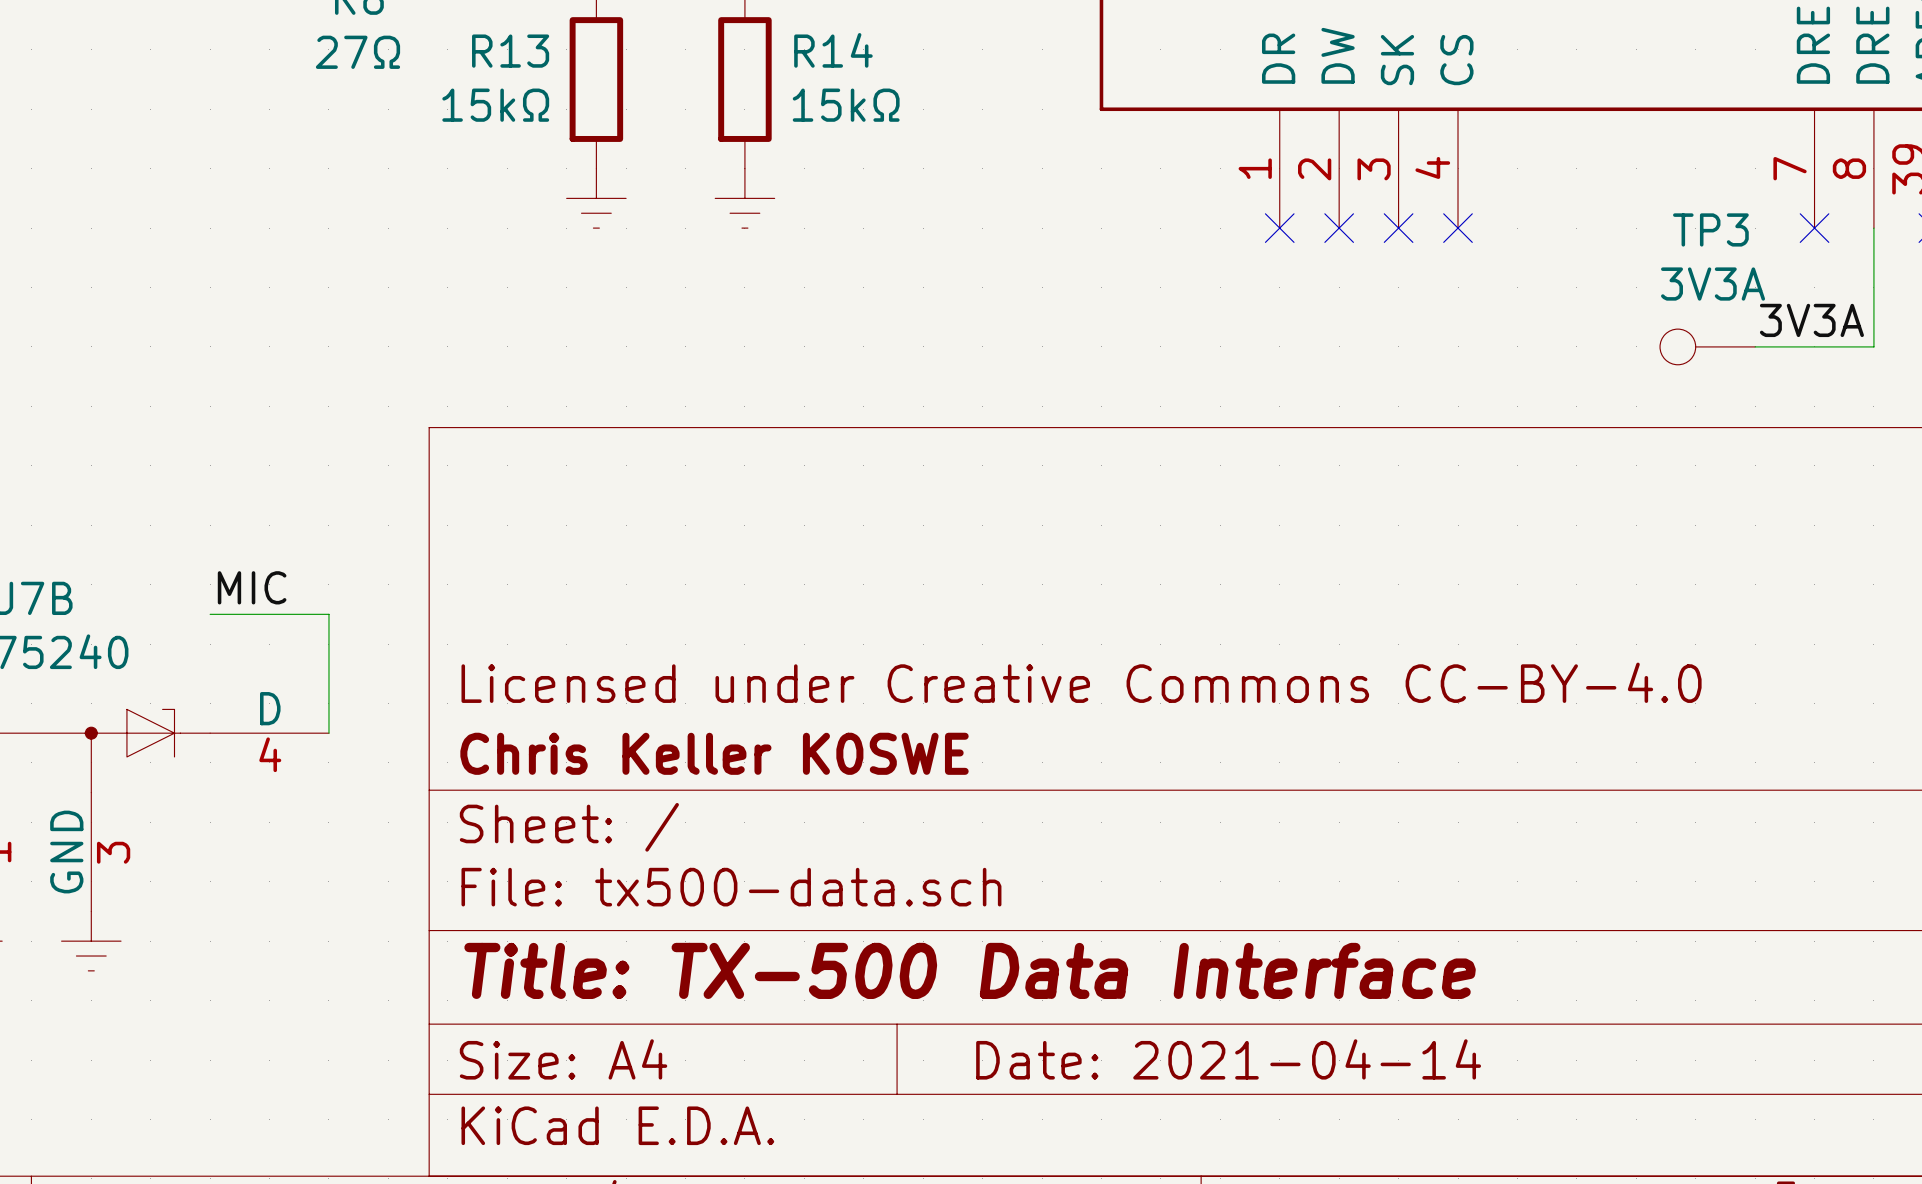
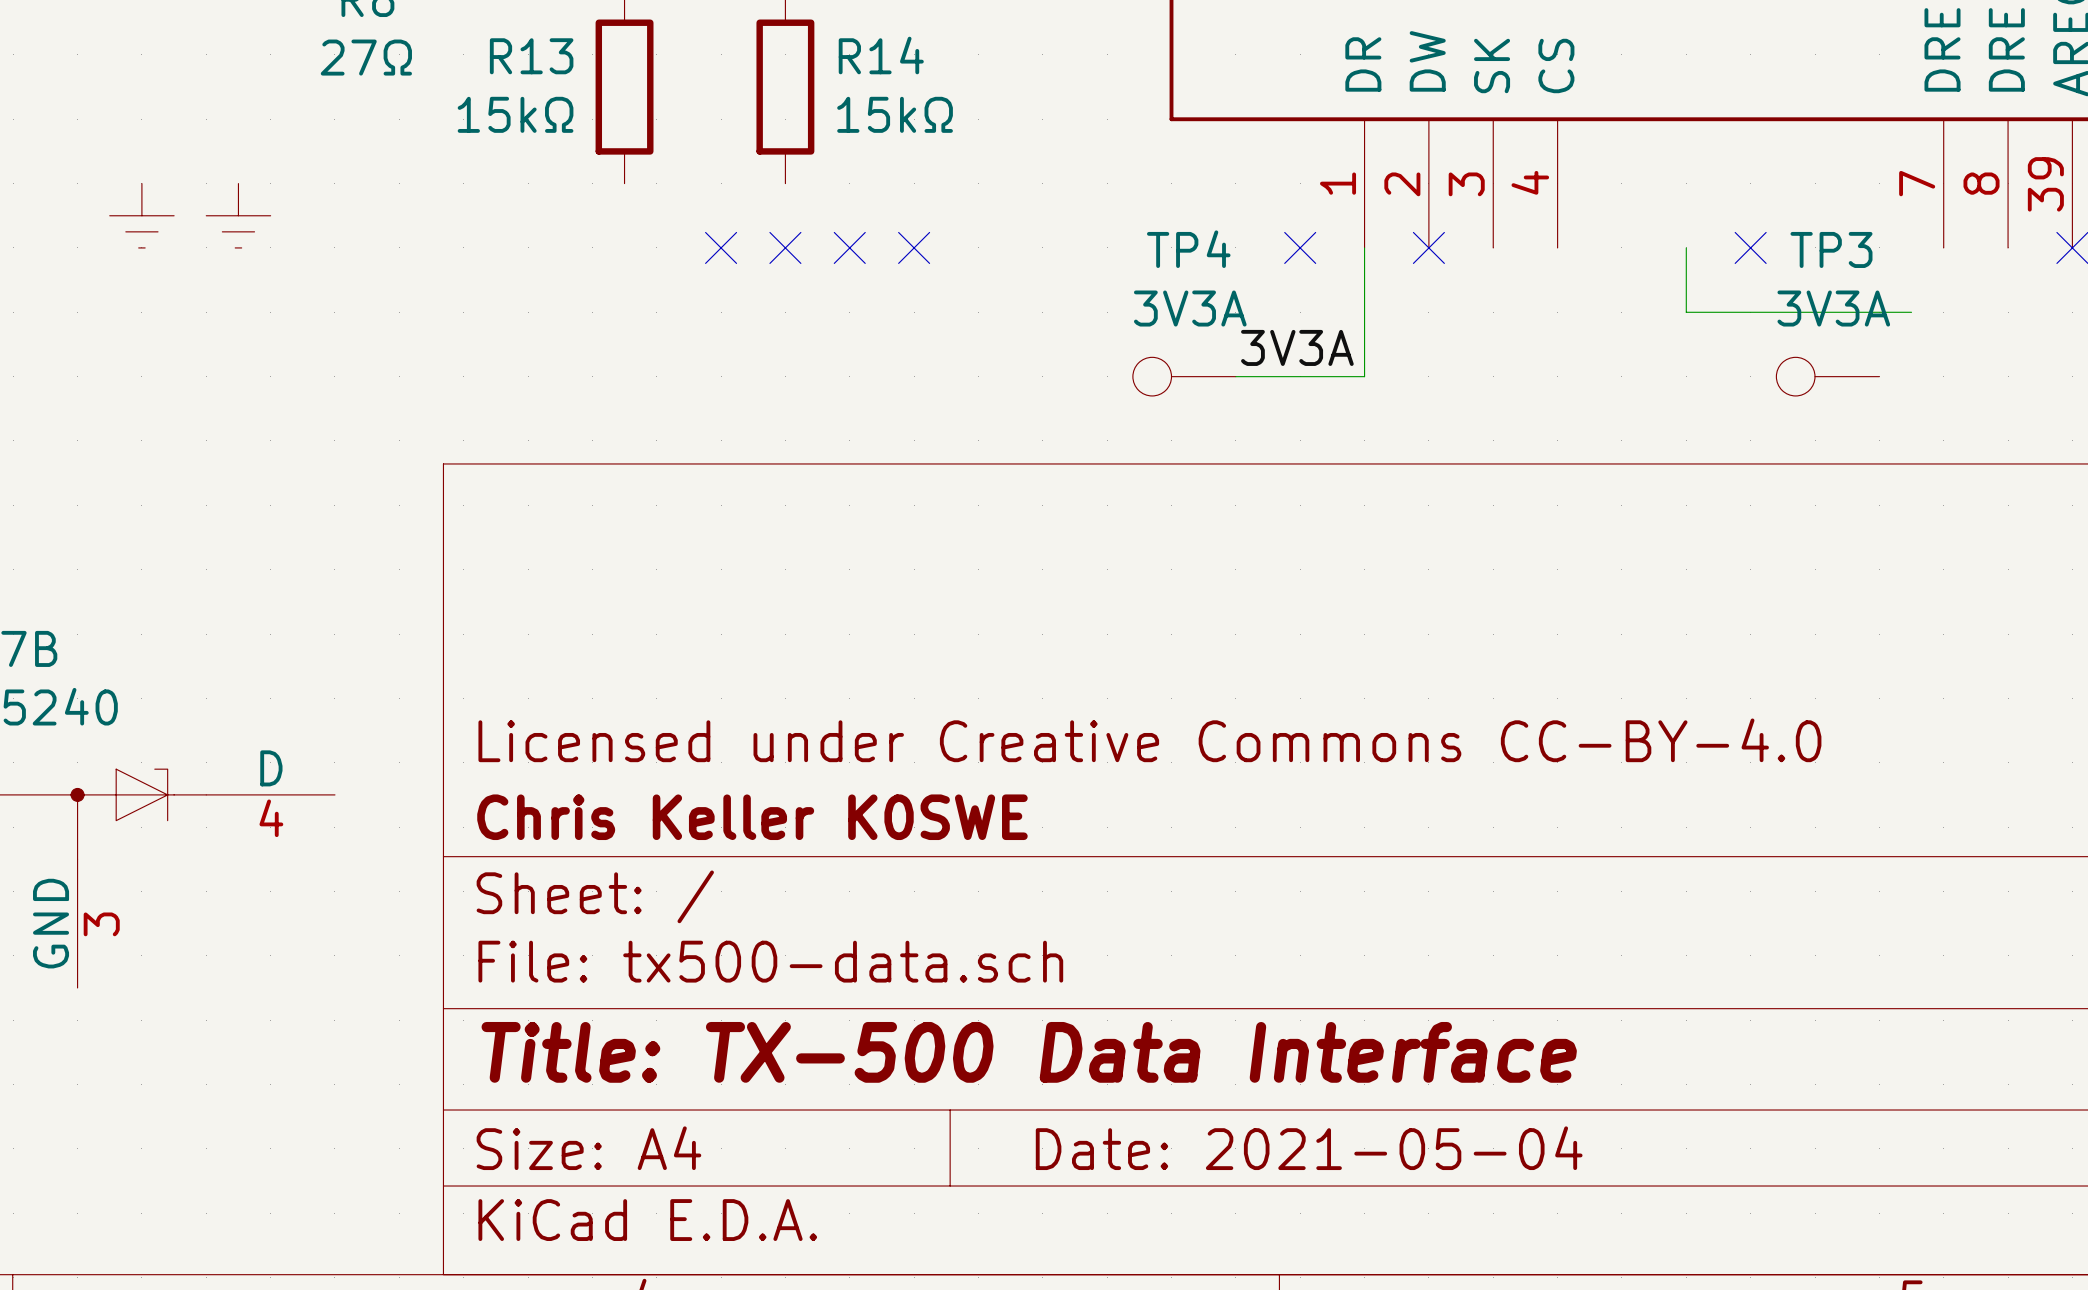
power symbol: none -> (141, 215)
power symbol: none -> (238, 215)
power symbol: (596, 198) -> none
power symbol: (744, 198) -> none
no-connect mark: none -> (721, 247)
no-connect mark: none -> (785, 247)
no-connect mark: none -> (849, 247)
no-connect mark: none -> (914, 247)
wire: none -> (1364, 247) (1364, 376) (1235, 376)
no-connect mark position: (1279, 228) -> (1300, 247)
no-connect mark: (1398, 228) -> none
no-connect mark: (1458, 228) -> none
wire: none -> (1686, 247) (1686, 312) (1911, 312)
no-connect mark: none -> (1750, 247)
no-connect mark: (1814, 228) -> none
wire: (1873, 228) (1873, 346) (1755, 346) -> none
label: none -> 3V3A (1297, 347)
label: 3V3A (1811, 320) -> none
TP4: none -> 3V3A (1184, 376)
label: MIC (252, 587) -> none
wire: (210, 614) (328, 614) (328, 733) -> none
power symbol: (91, 941) -> none
title block: Date: 2021-04-14 (1228, 1059) -> Date: 2021-05-04 (1309, 1148)

